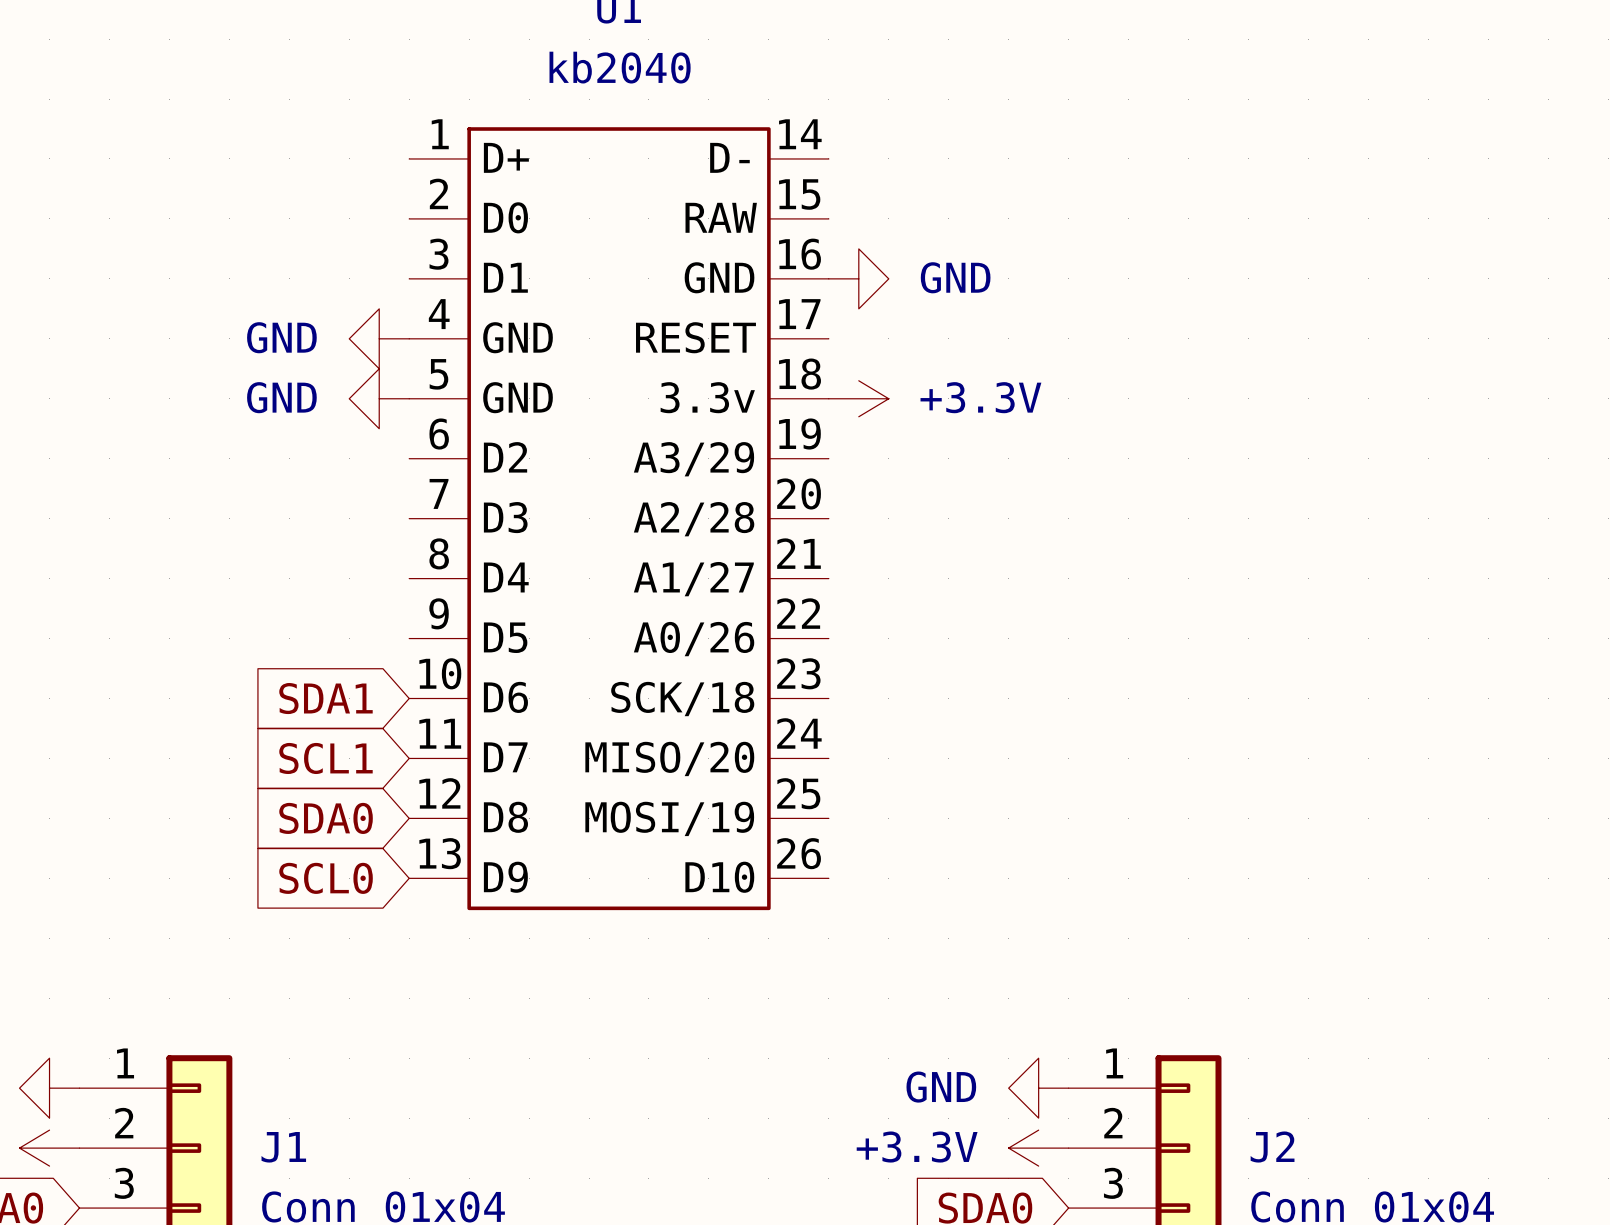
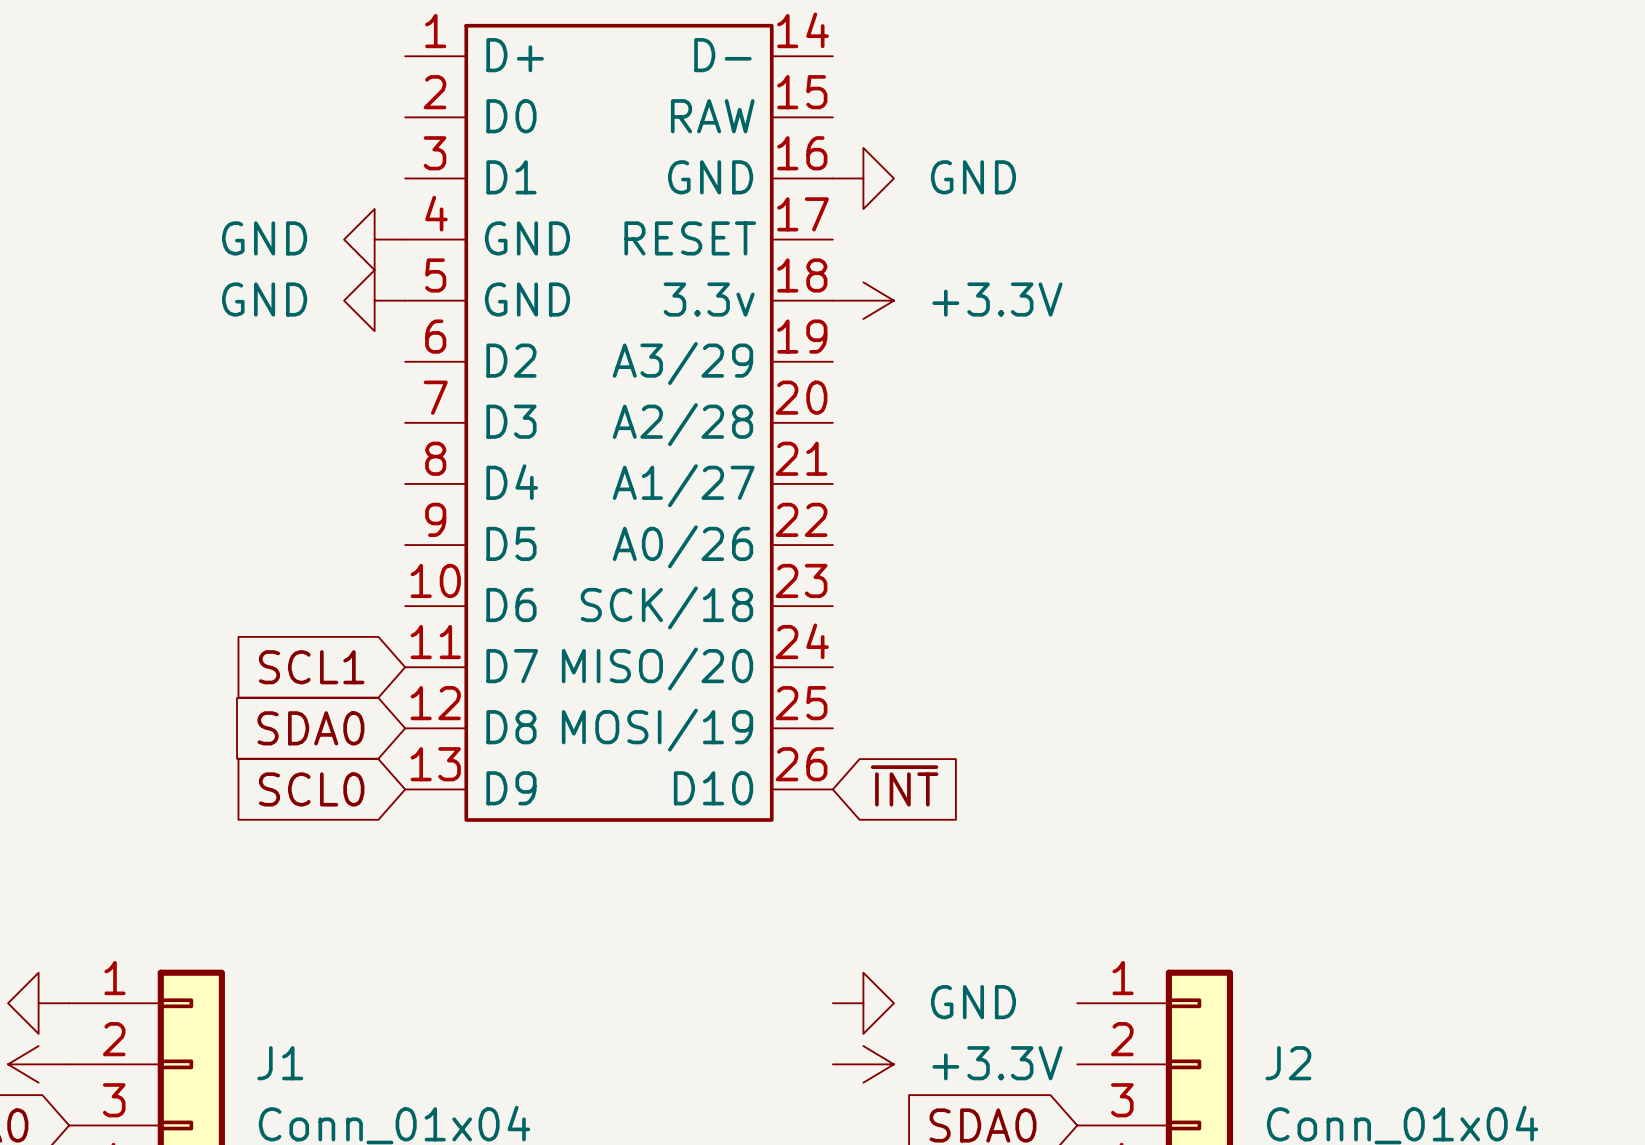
global label: SDA1 (325, 698) -> none
global label: none -> ~{INT} (904, 785)
power symbol rotation: 0° (1038, 1088) -> 180° (863, 1003)
power symbol position: GND (1038, 1088) -> GND (863, 1003)
power symbol rotation: 0° (1038, 1148) -> 180° (863, 1064)
power symbol position: +3.3V (1038, 1148) -> +3.3V (863, 1064)

